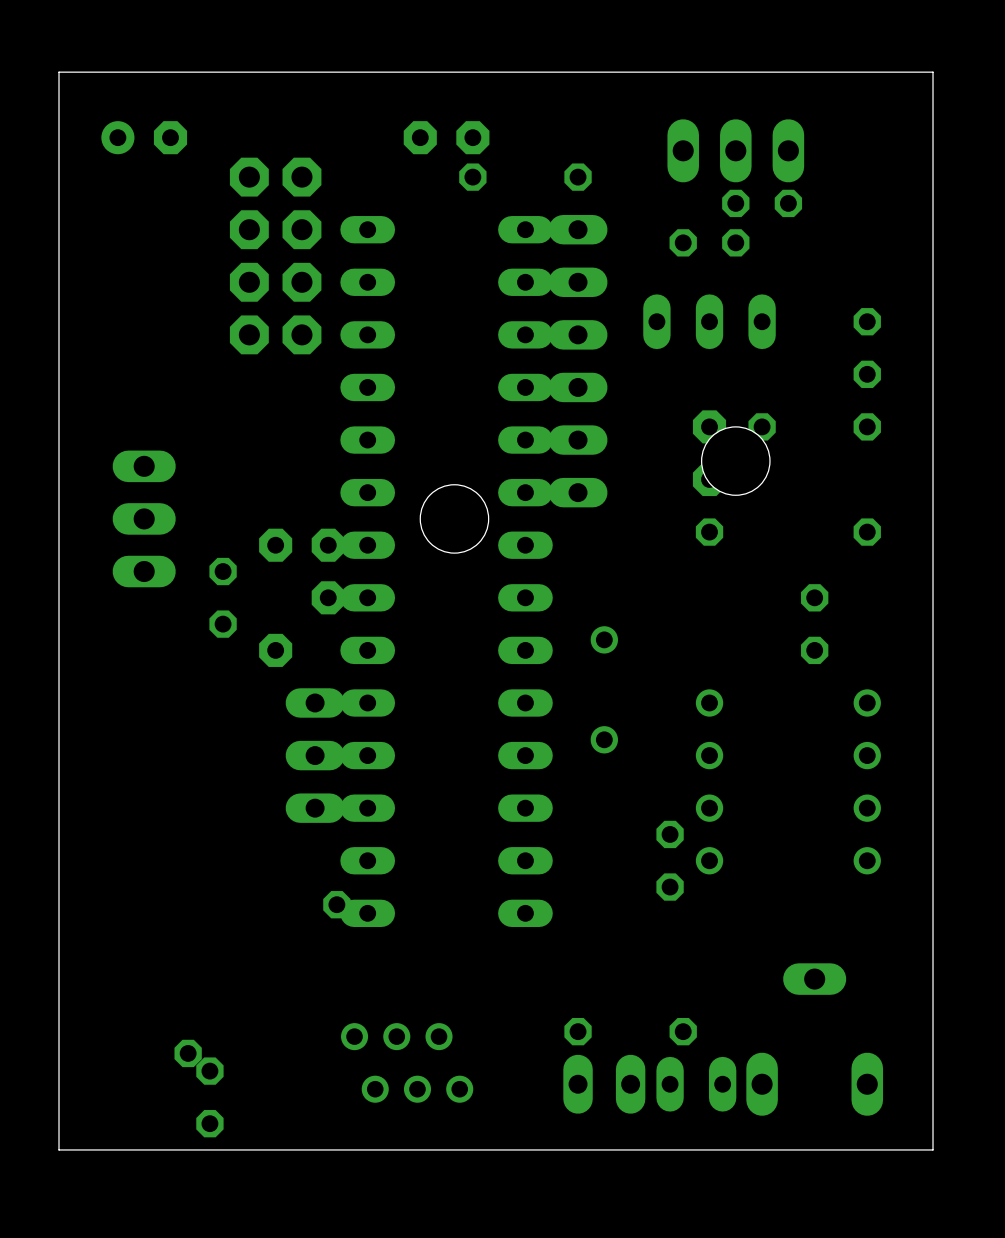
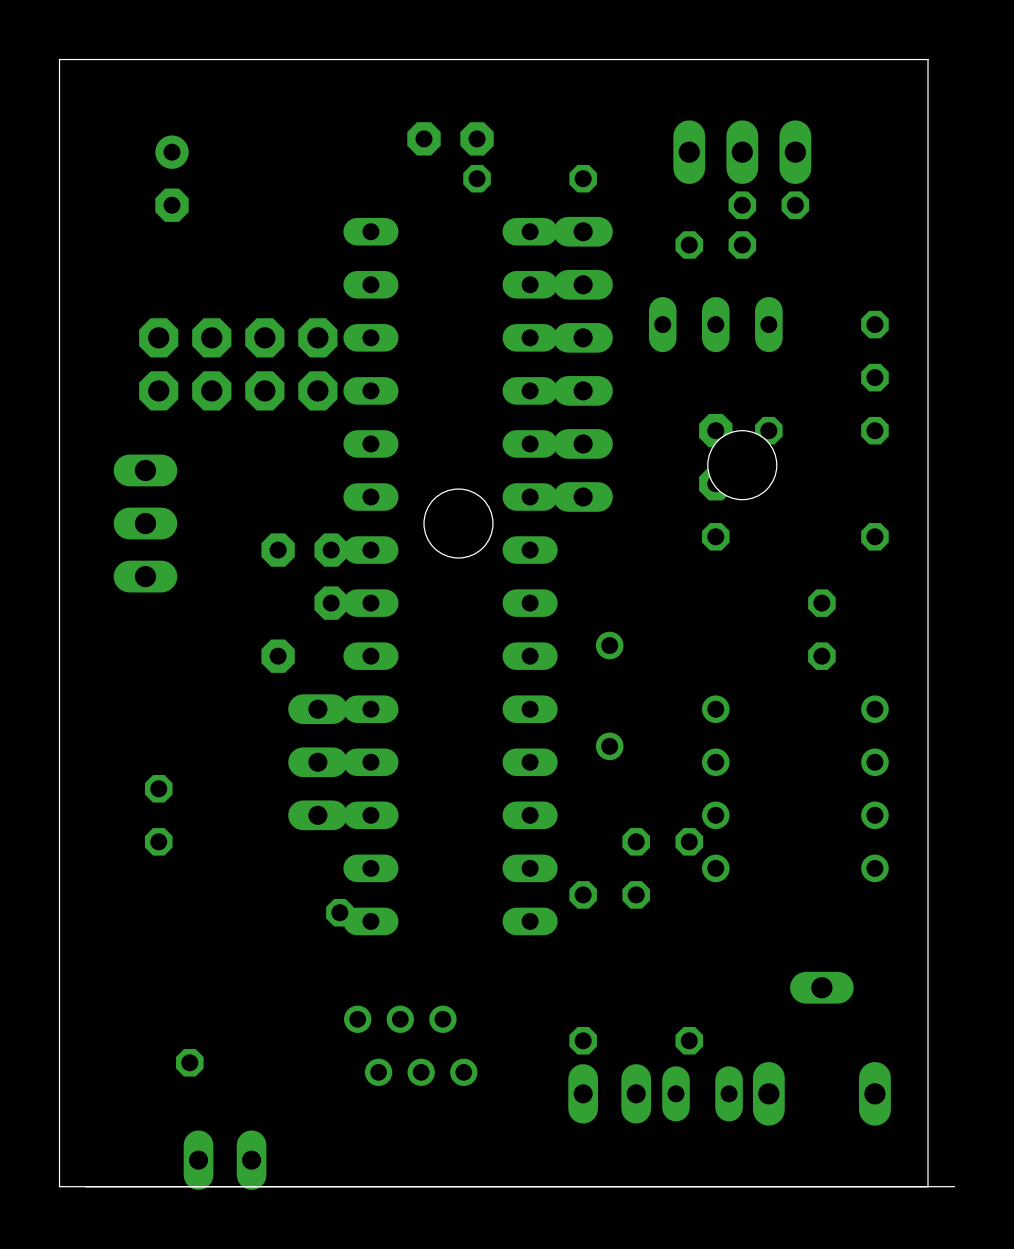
board edge: (59, 72) (933, 72) (933, 1149) (59, 1149) -> (59, 72) (59, 59) (927, 59) (927, 1186)
part rotation: 0° (144, 137) -> 90° clockwise (172, 178)
part rotation: 0° (275, 255) -> 90° clockwise (238, 364)
part: (223, 597) -> none
part: none -> (158, 815)
part rotation: 0° (670, 860) -> 90° clockwise (662, 841)
part: none -> (609, 894)
part position: (407, 1062) -> (410, 1045)
part: (209, 1097) -> none
board edge: none -> (59, 1160) (59, 1186) (954, 1186)
part: none -> (225, 1160)

